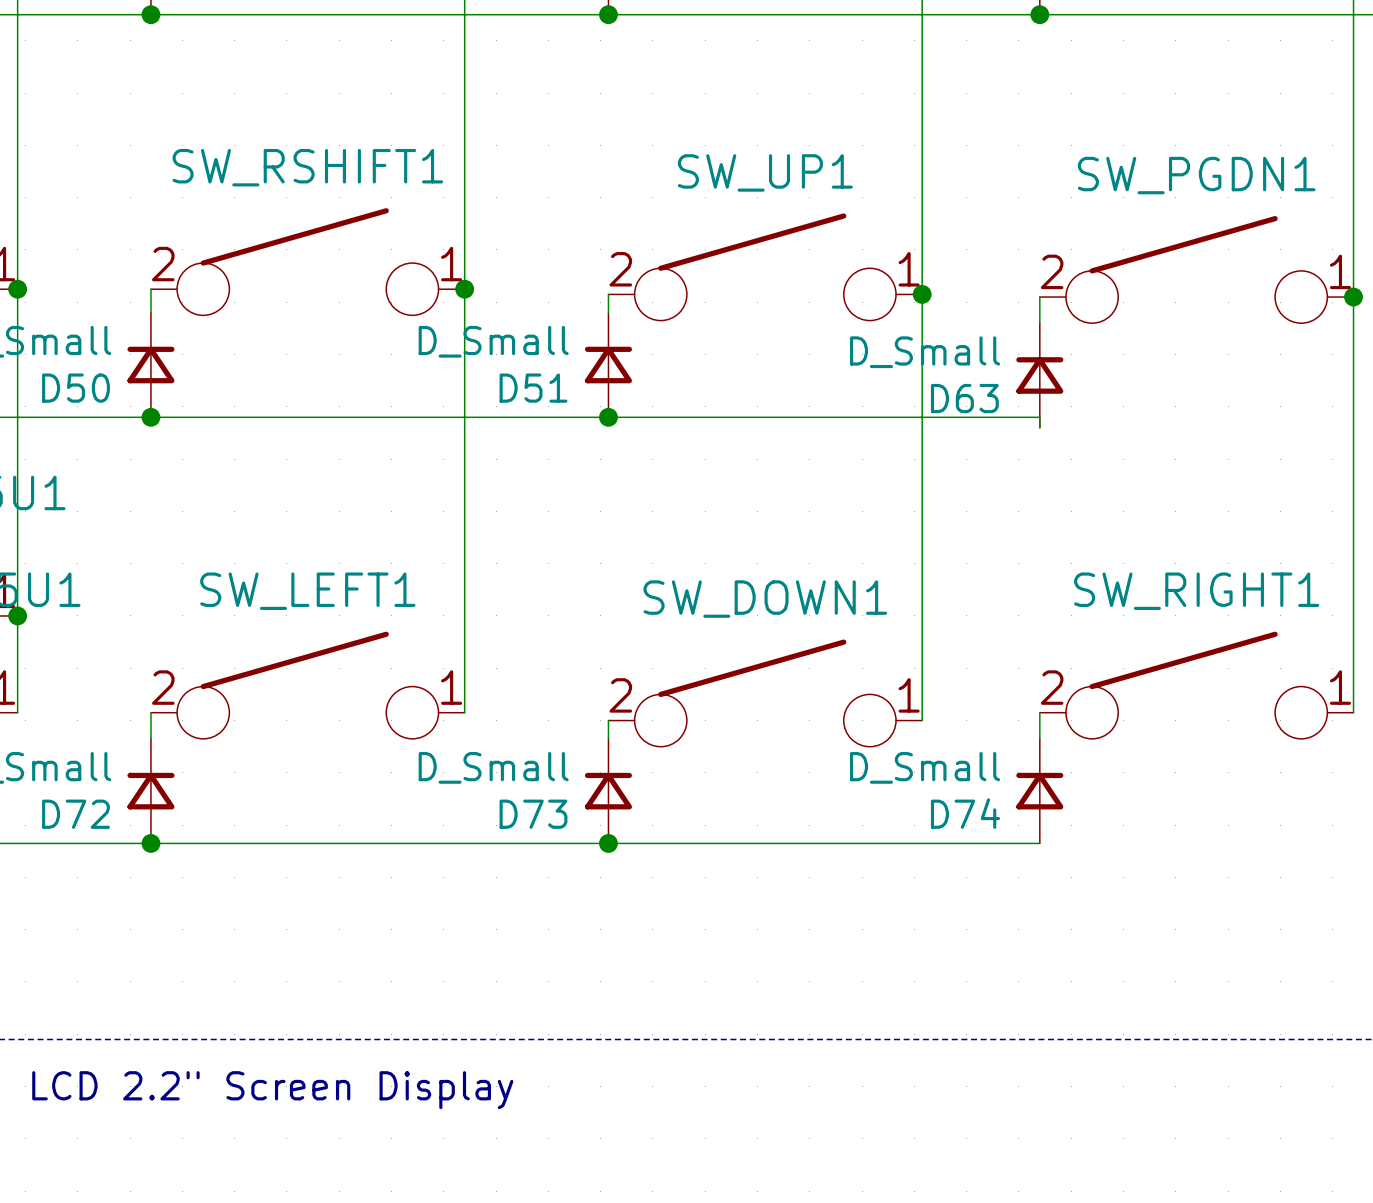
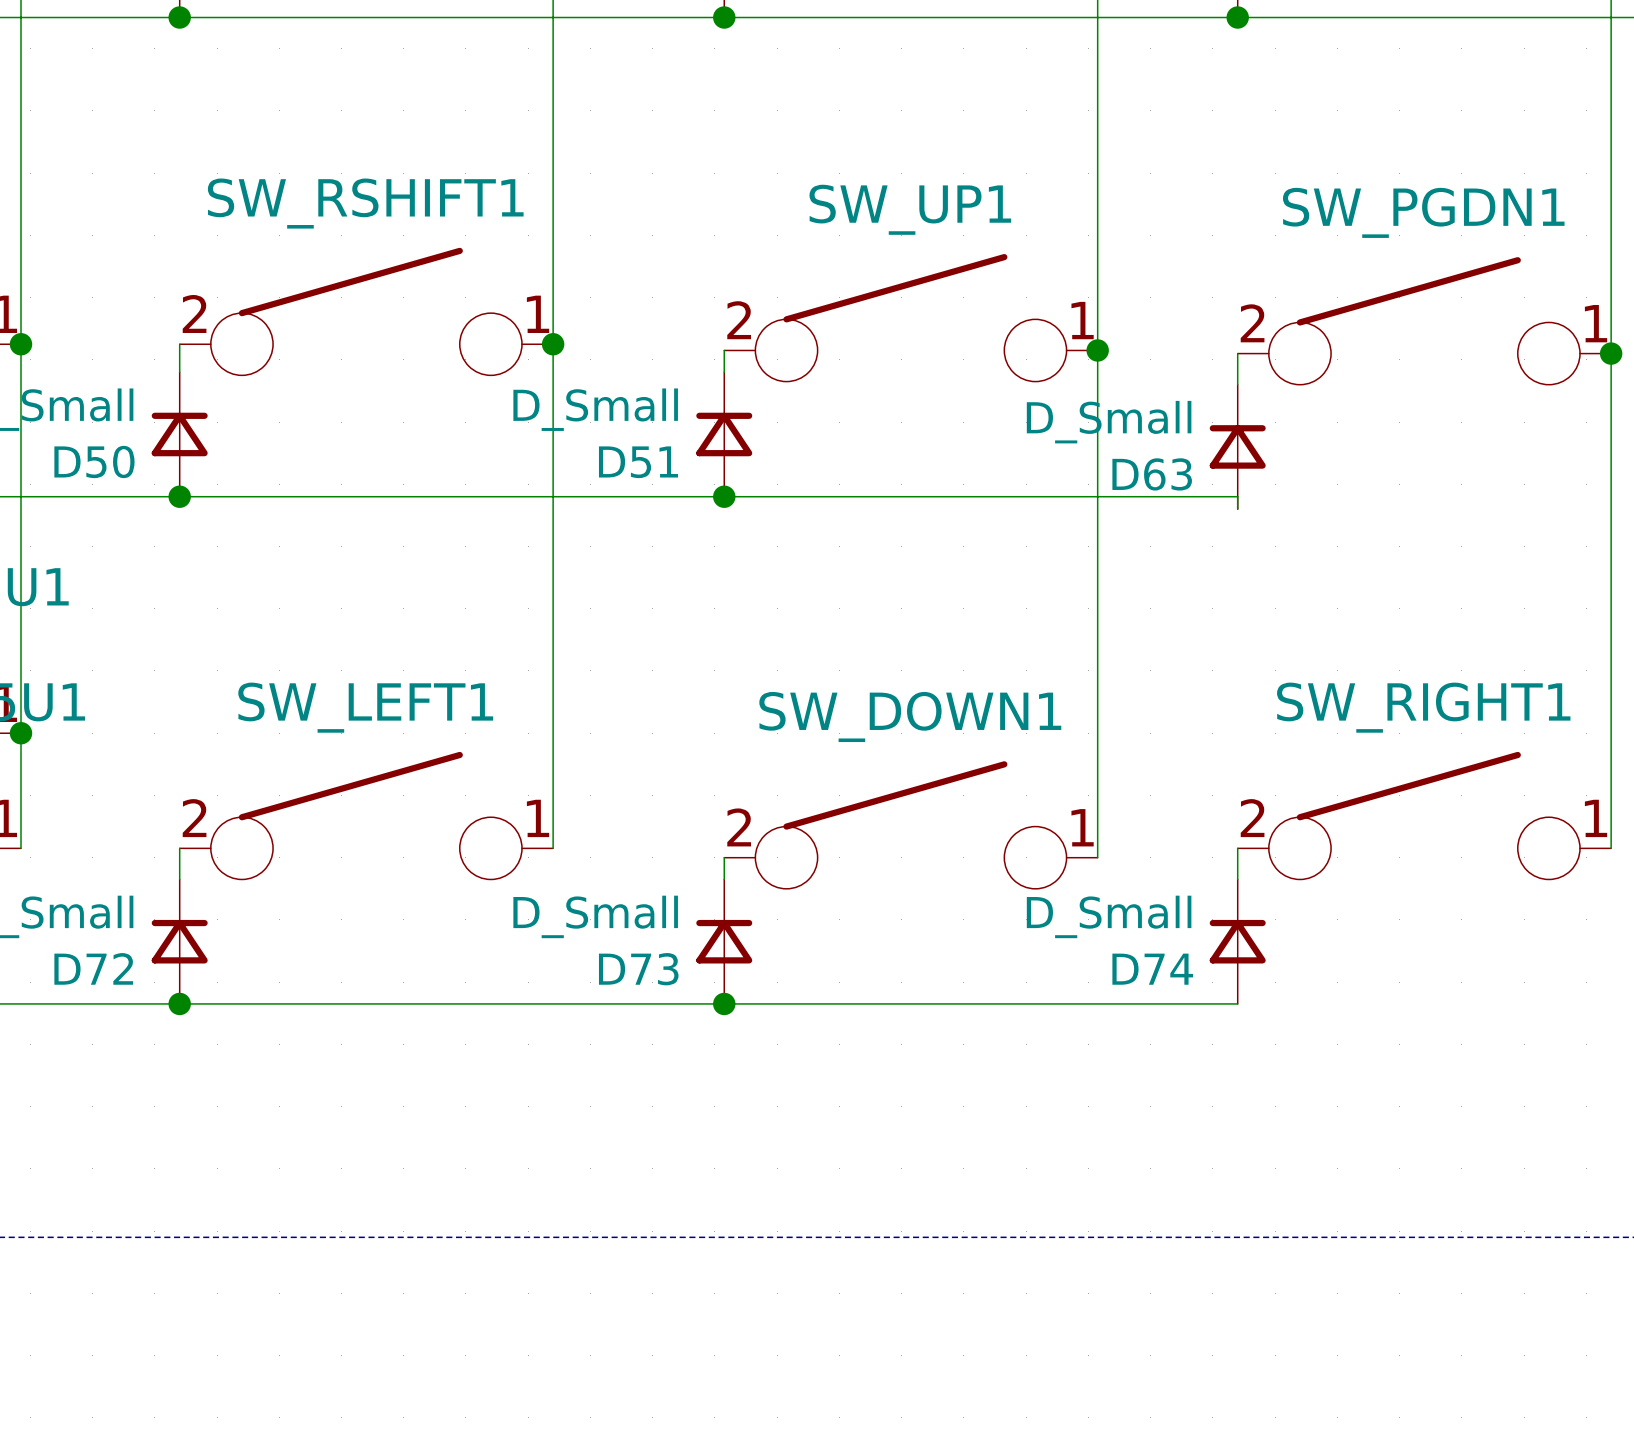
text: LCD 2.2" Screen Display (272, 1090) -> none

